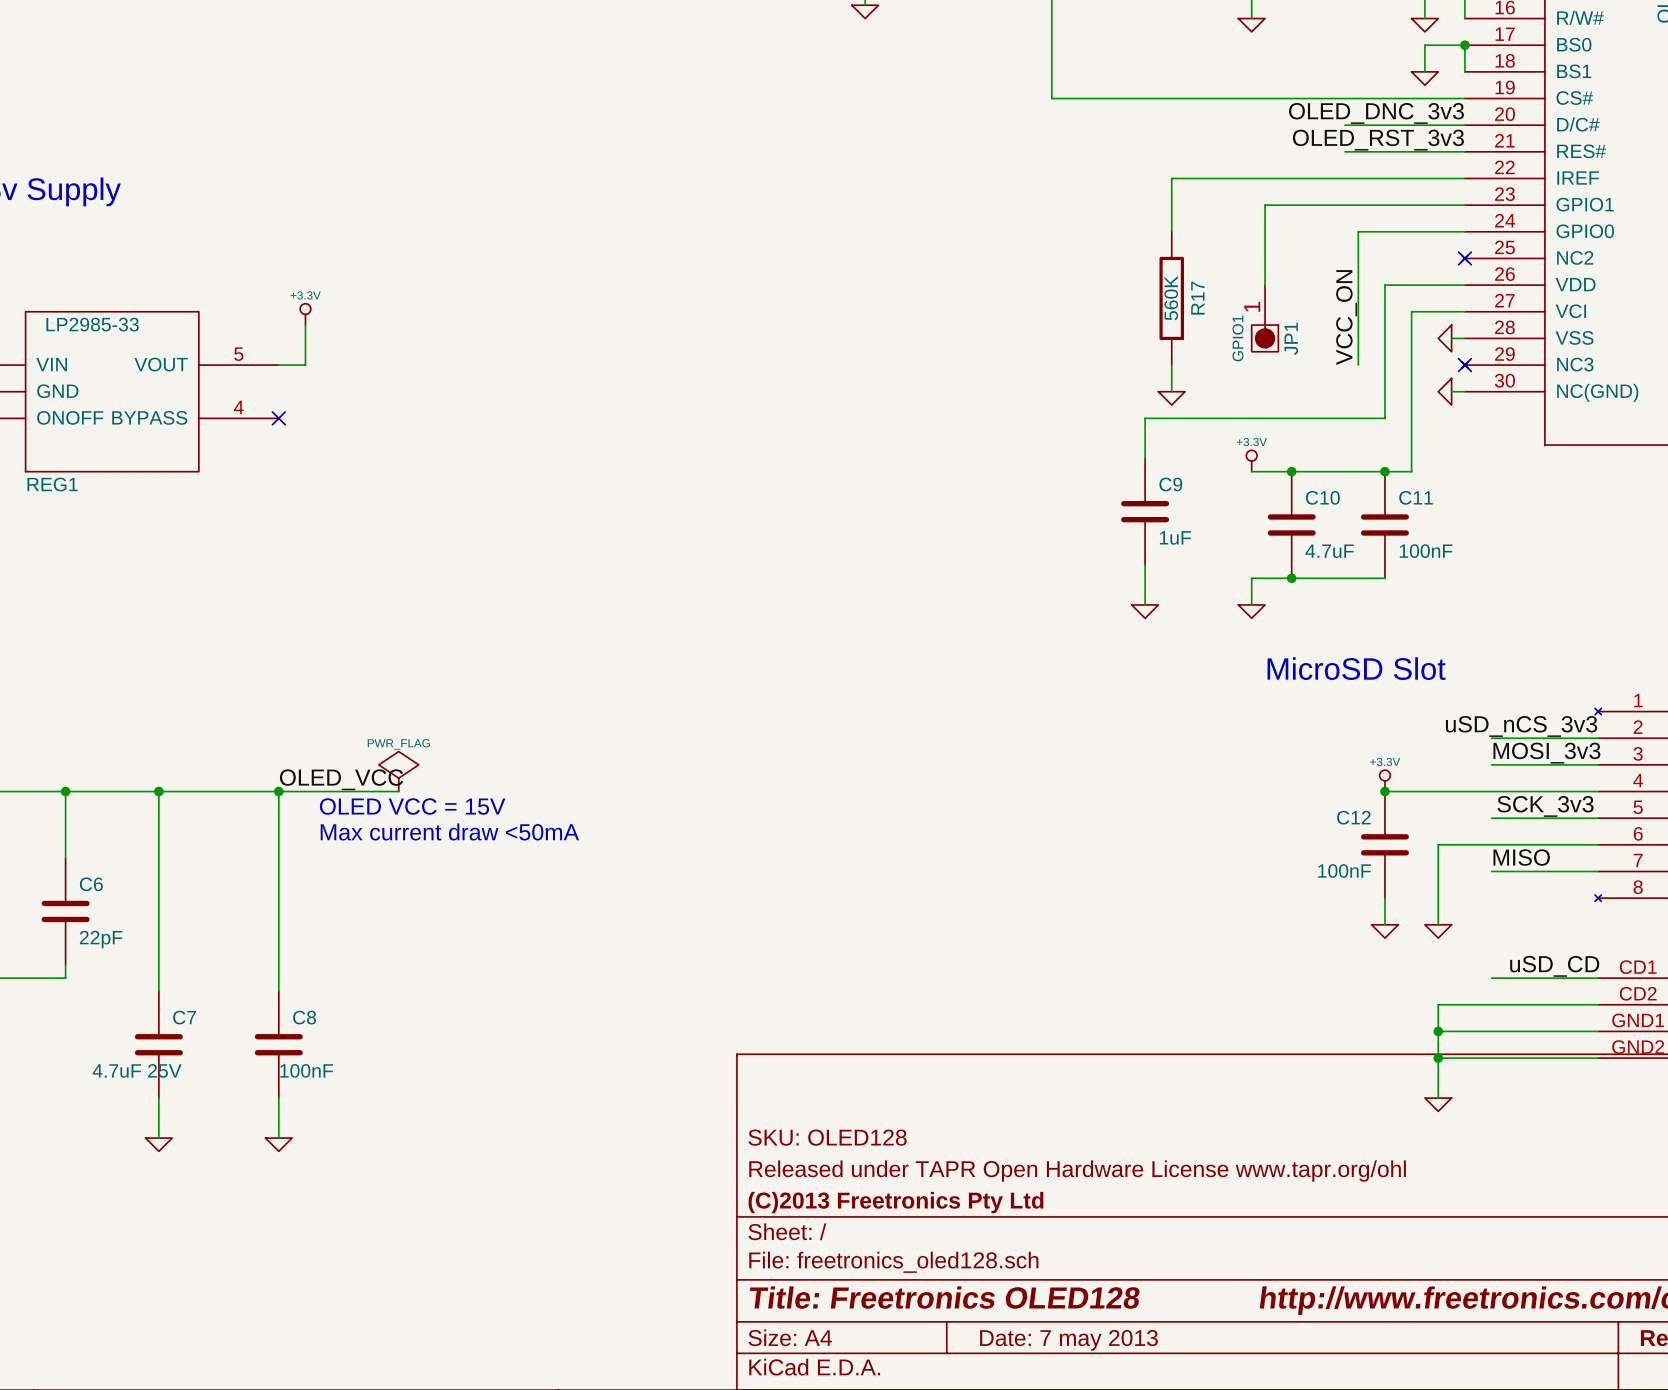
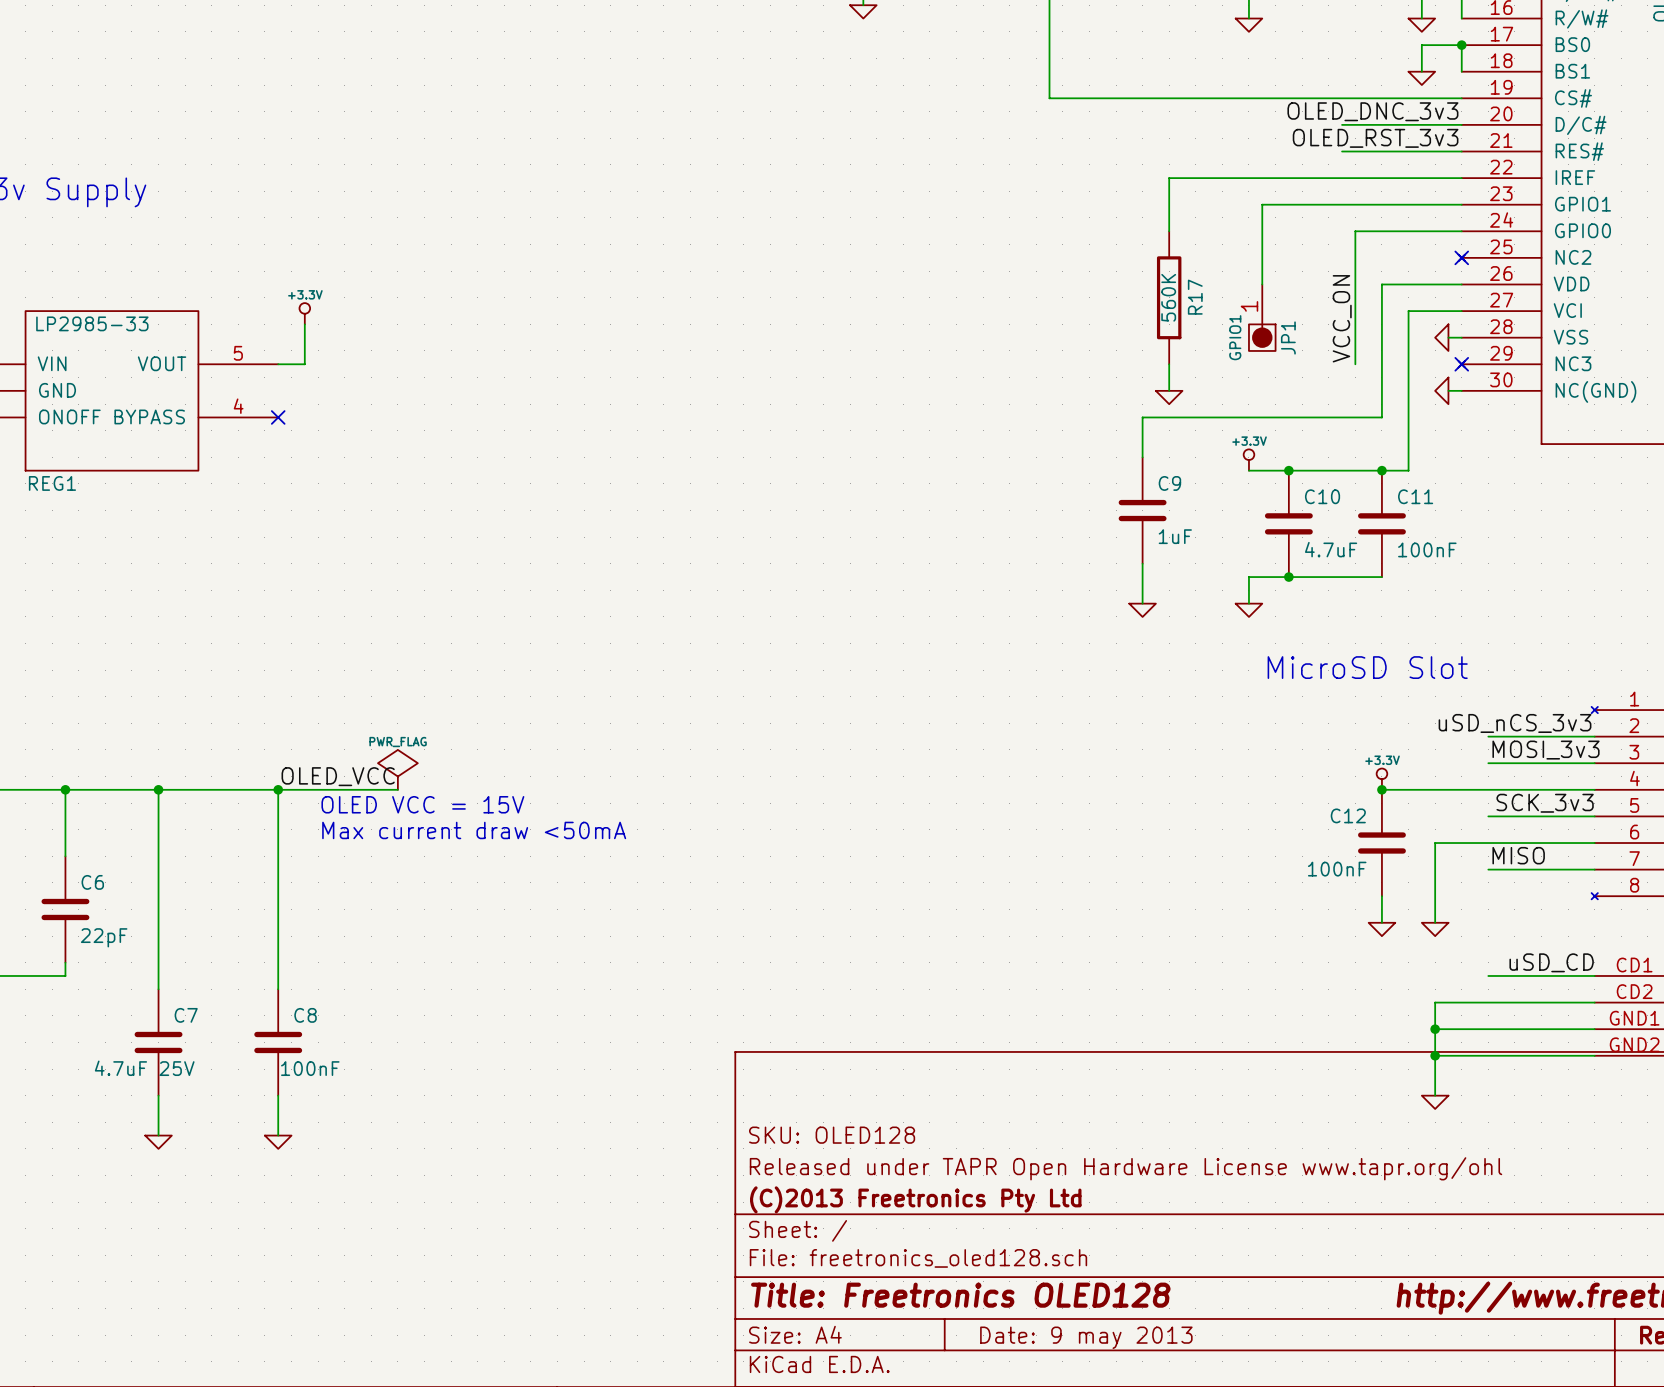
title block: Date: 7 may 2013 (1068, 1340) -> Date: 9 may 2013 (1086, 1337)

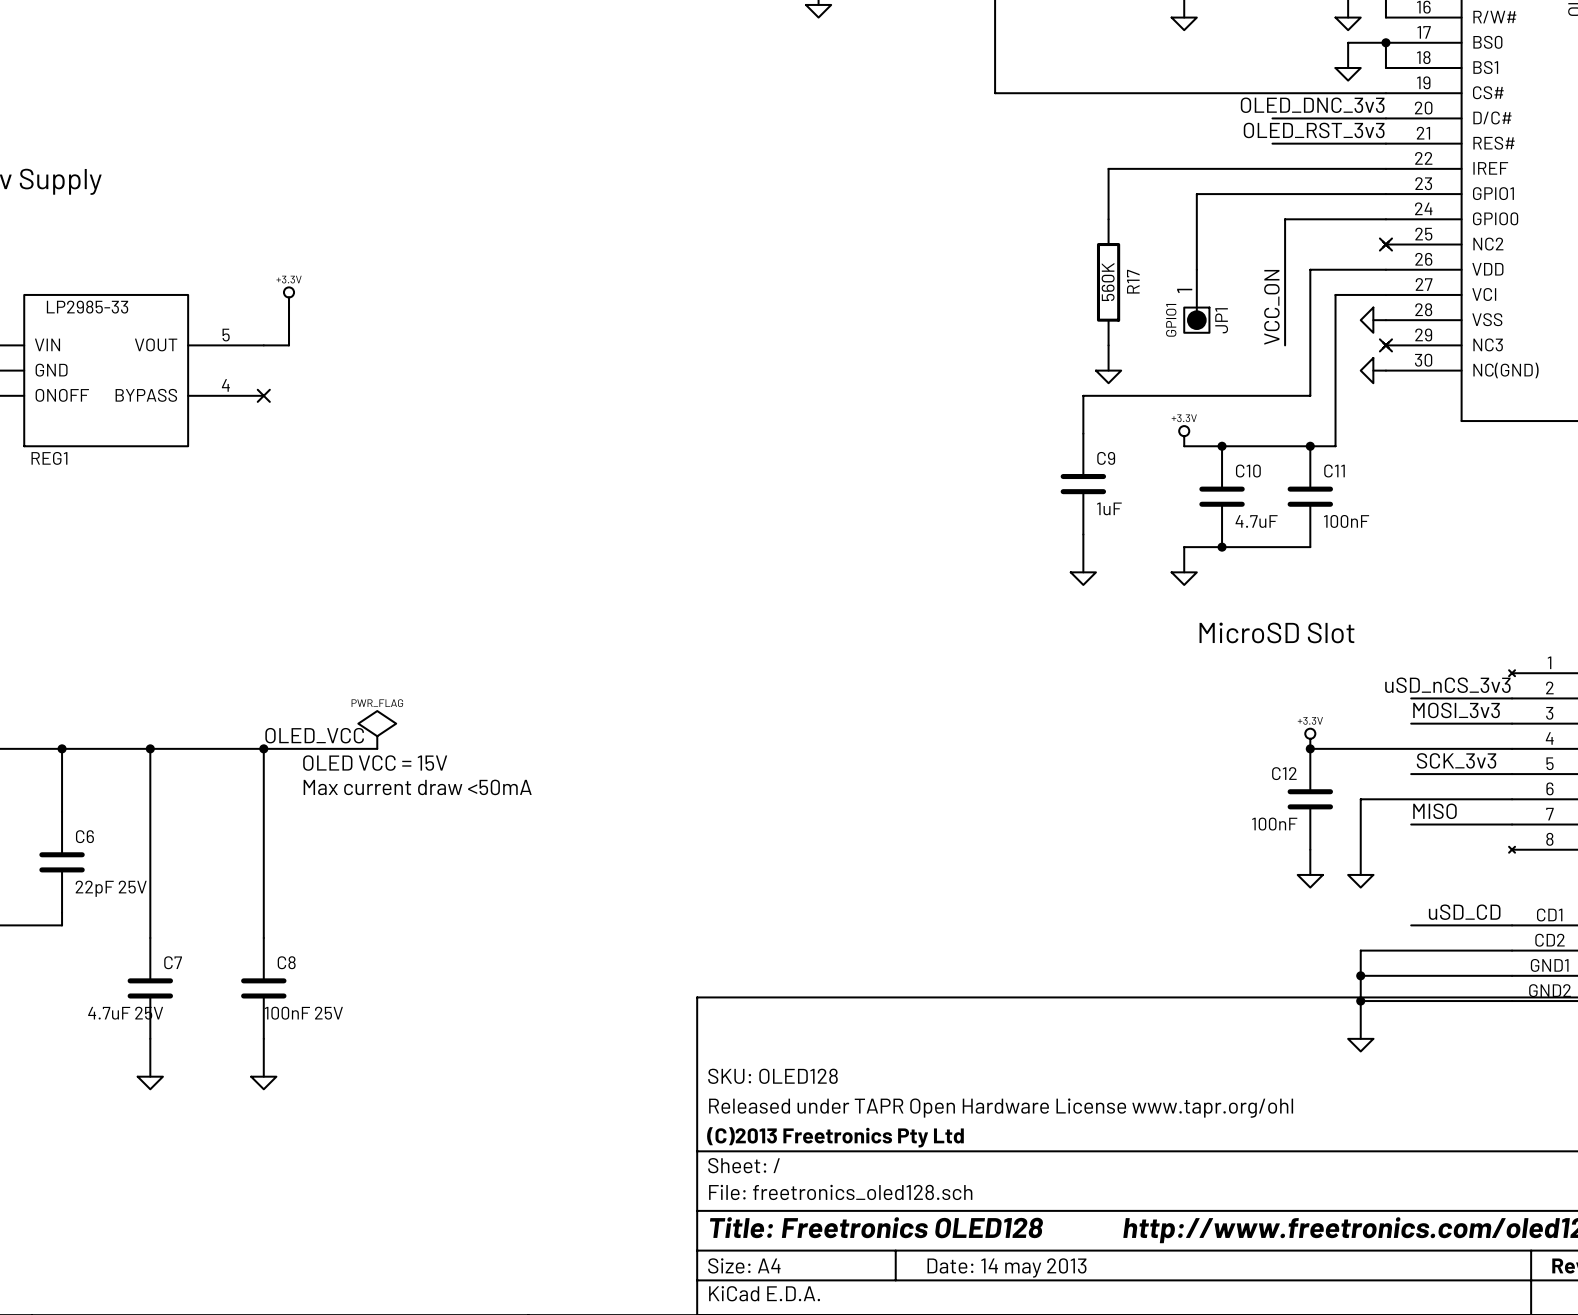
C6 value: 22pF (104, 937) -> 22pF 25V (111, 888)
C8 value: 100nF (310, 1068) -> 100nF 25V (303, 1013)
title block: Date: 9 may 2013 (1086, 1337) -> Date: 14 may 2013 (1007, 1267)

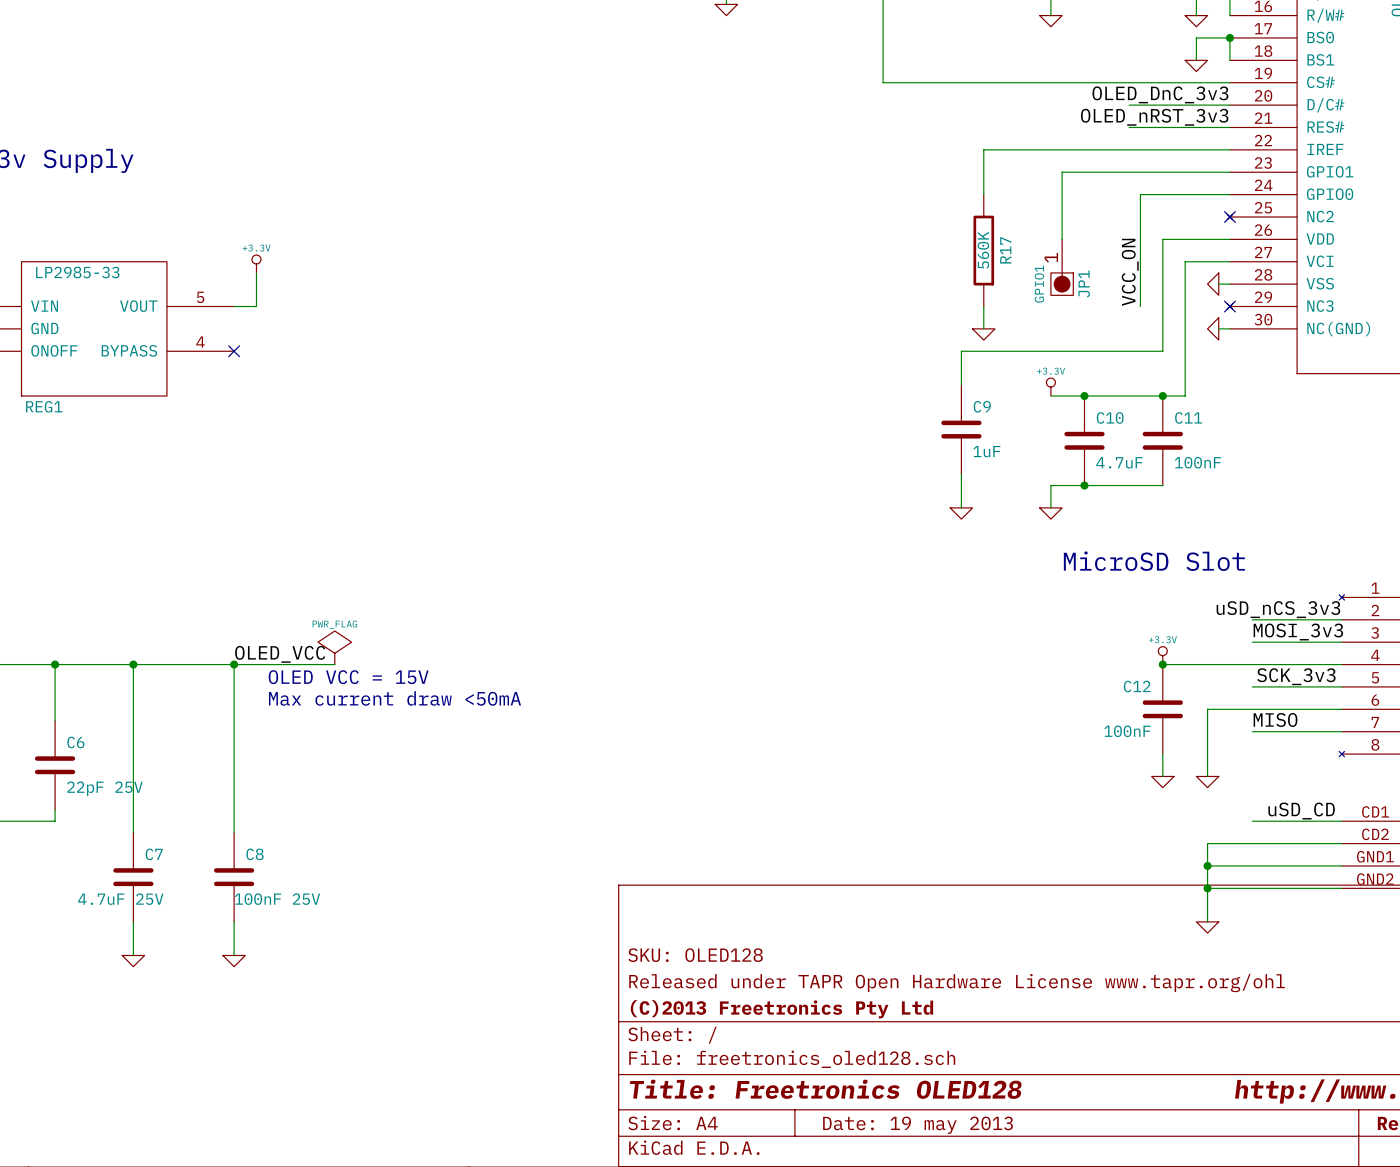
label: OLED_DNC_3v3 (1312, 105) -> OLED_DnC_3v3 (1160, 94)
label: OLED_RST_3v3 (1314, 130) -> OLED_nRST_3v3 (1154, 117)
title block: Date: 14 may 2013 (1007, 1267) -> Date: 19 may 2013 (918, 1125)

